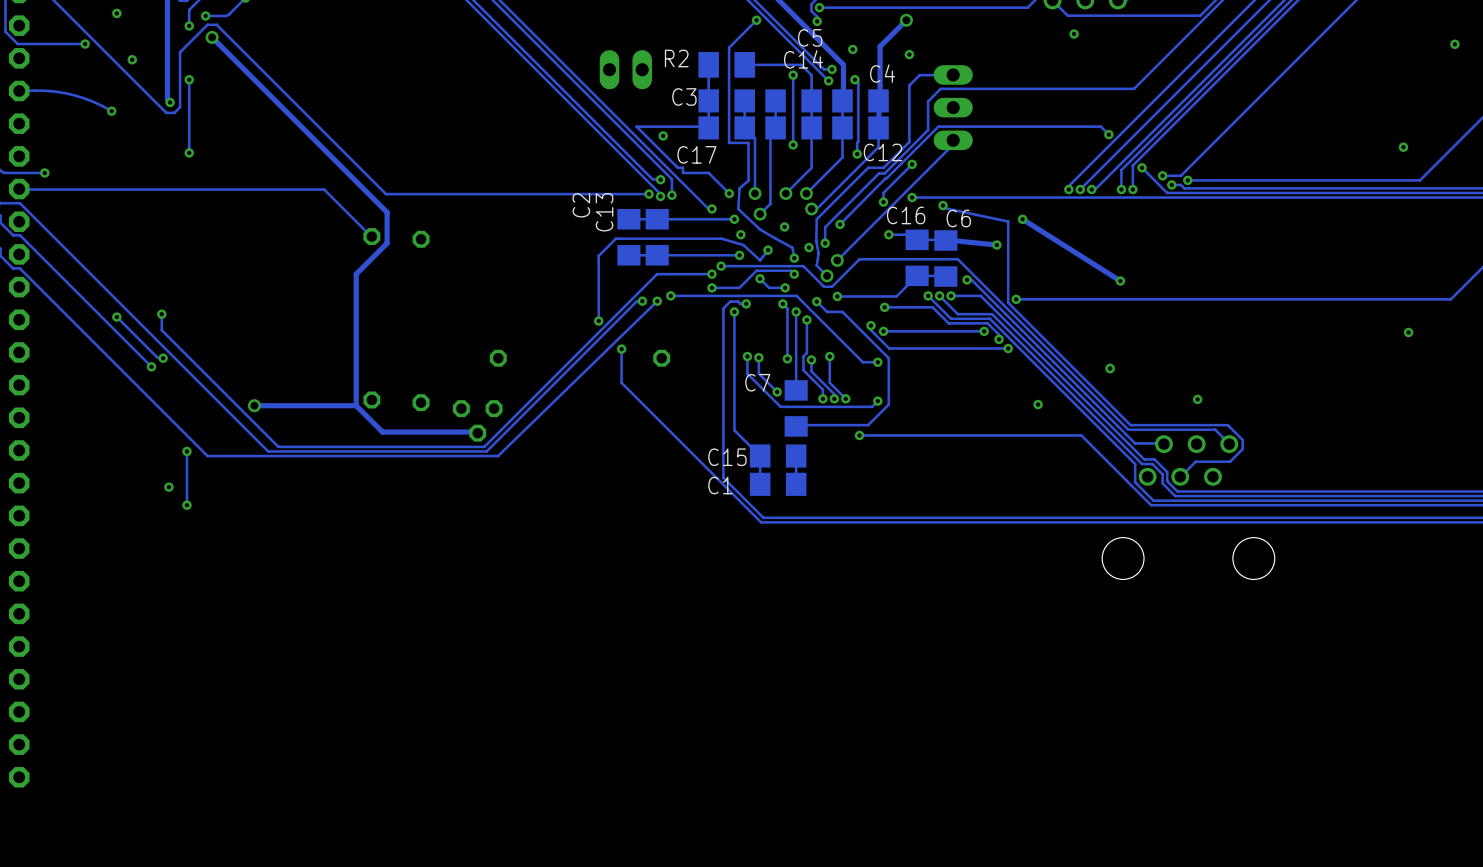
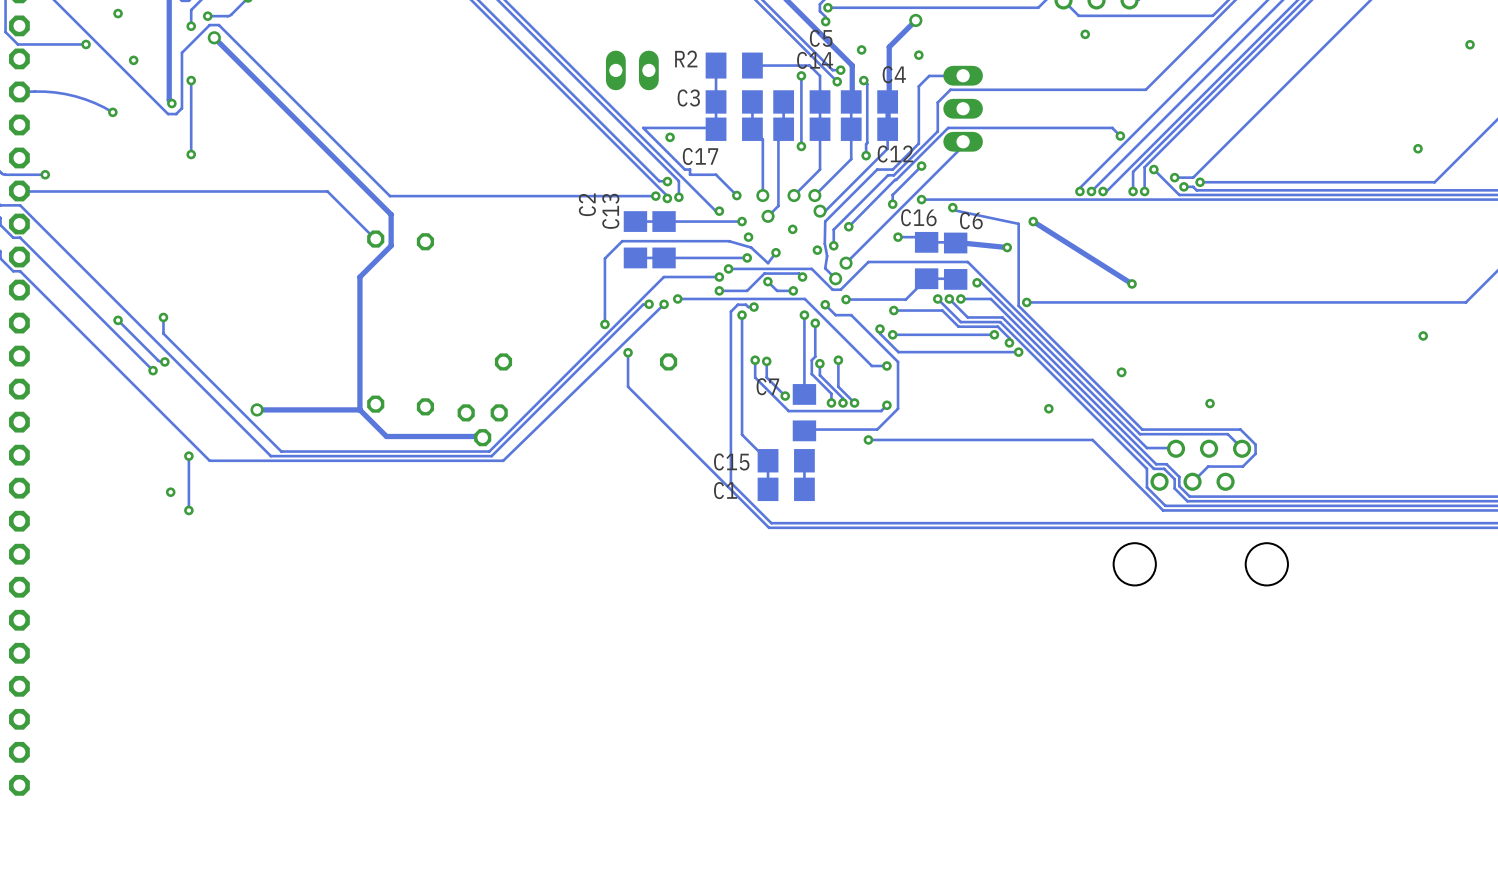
track: (756, 20) (729, 47) (729, 142) (748, 142) (748, 180) (739, 188) (738, 208) (760, 229) (792, 247) (794, 258) -> none
via: (756, 20) -> none
via: (794, 258) -> none
track: (782, 303) (787, 308) (787, 358) -> none
via: (782, 303) -> none
via: (787, 358) -> none

